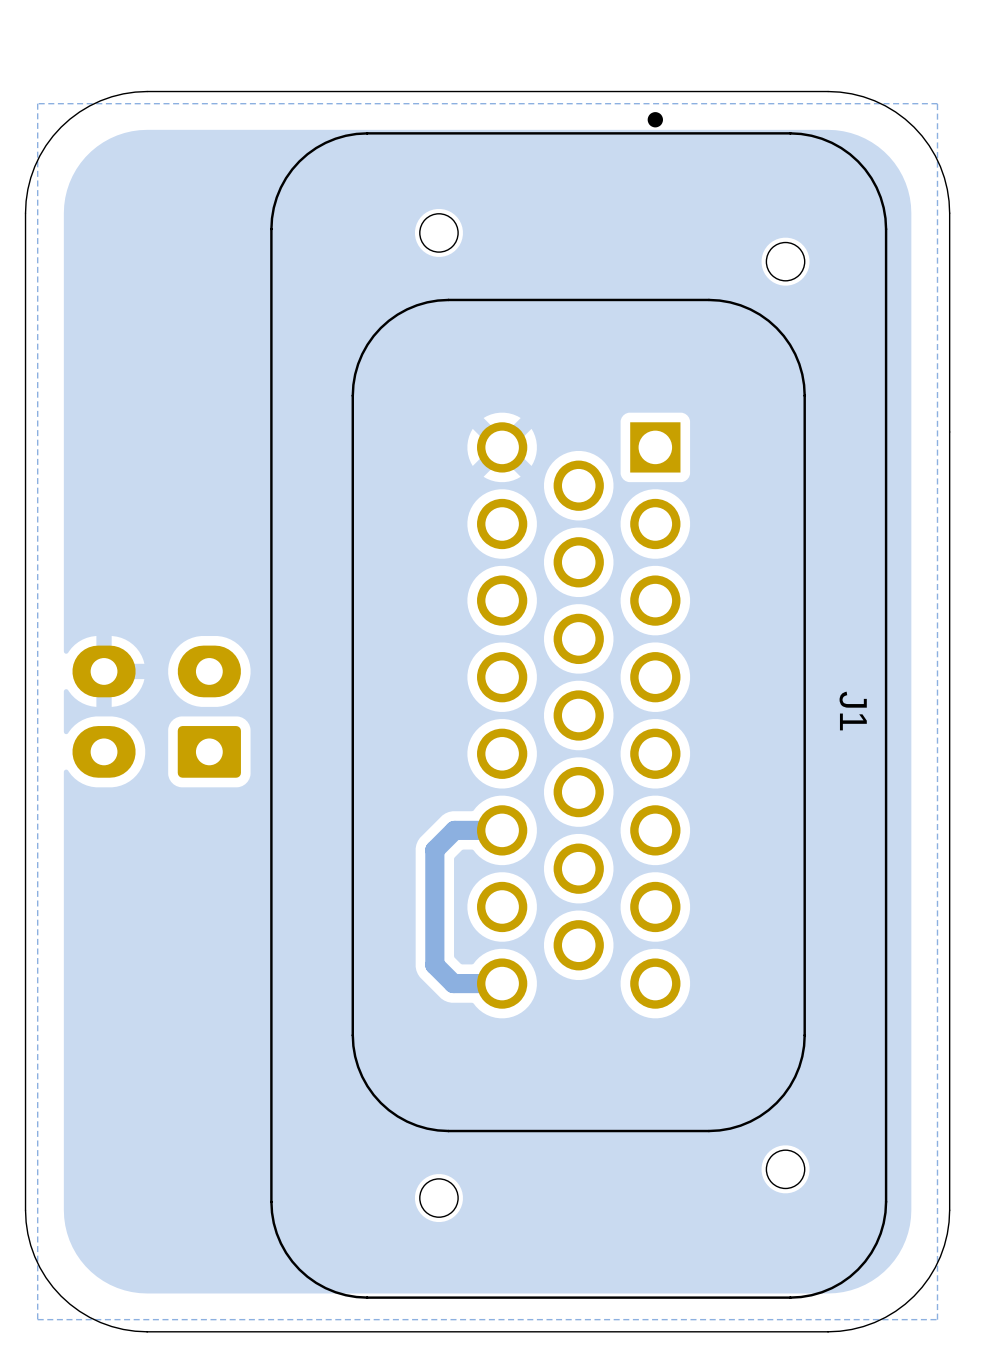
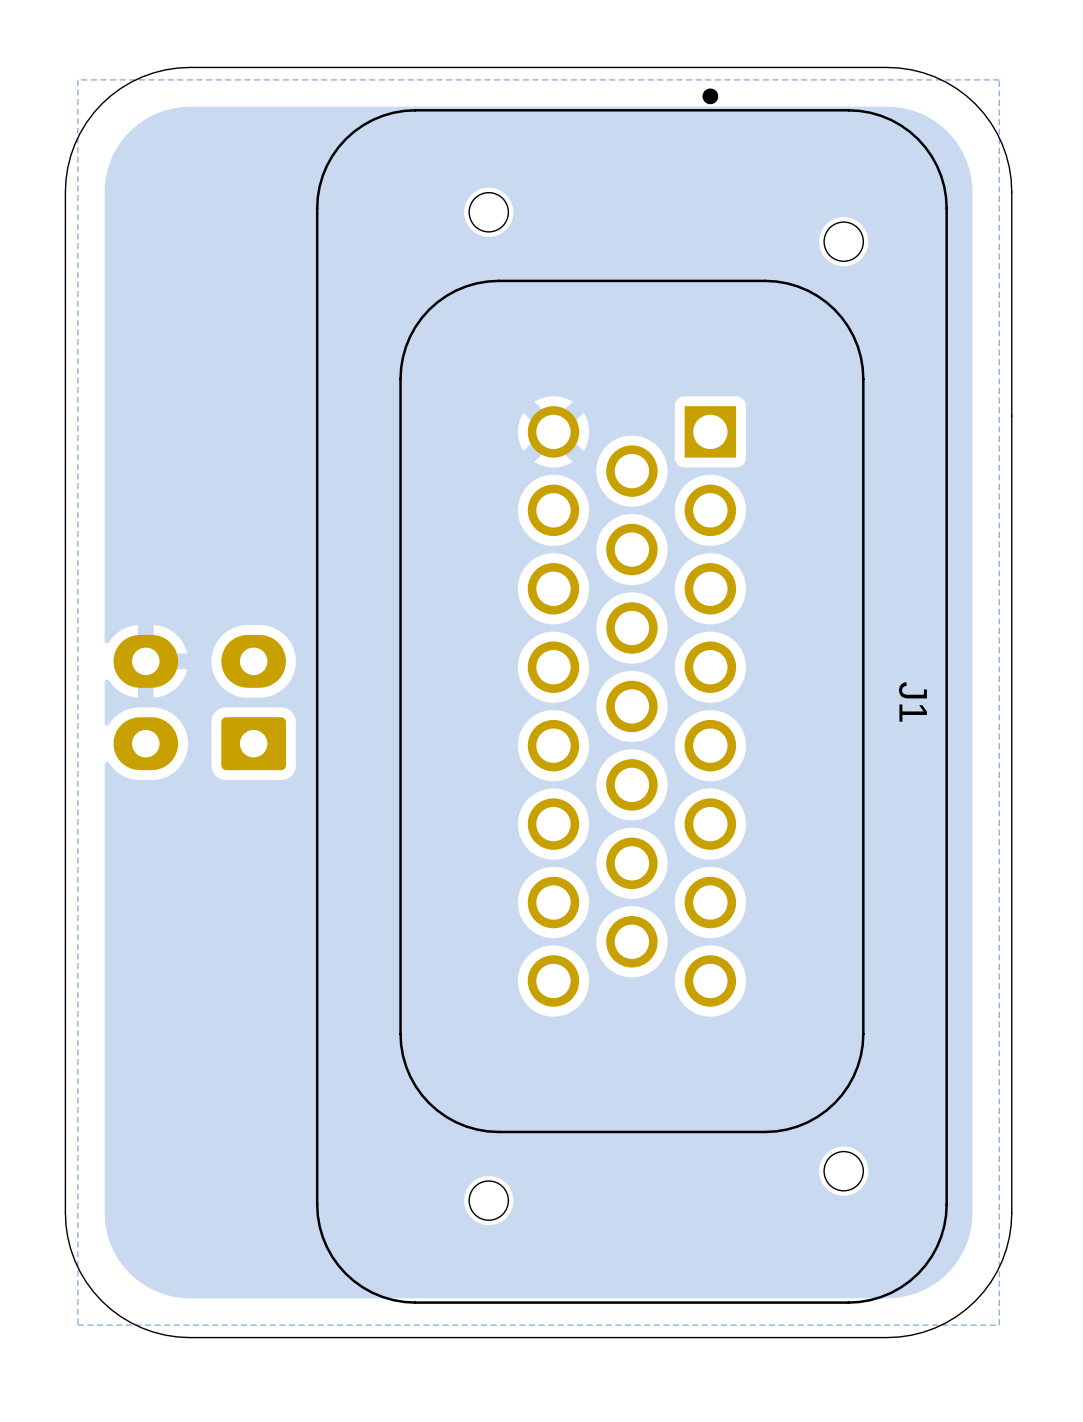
track: (502, 830) (454, 830) (434, 850) (434, 965) (453, 983) (502, 983) -> none

